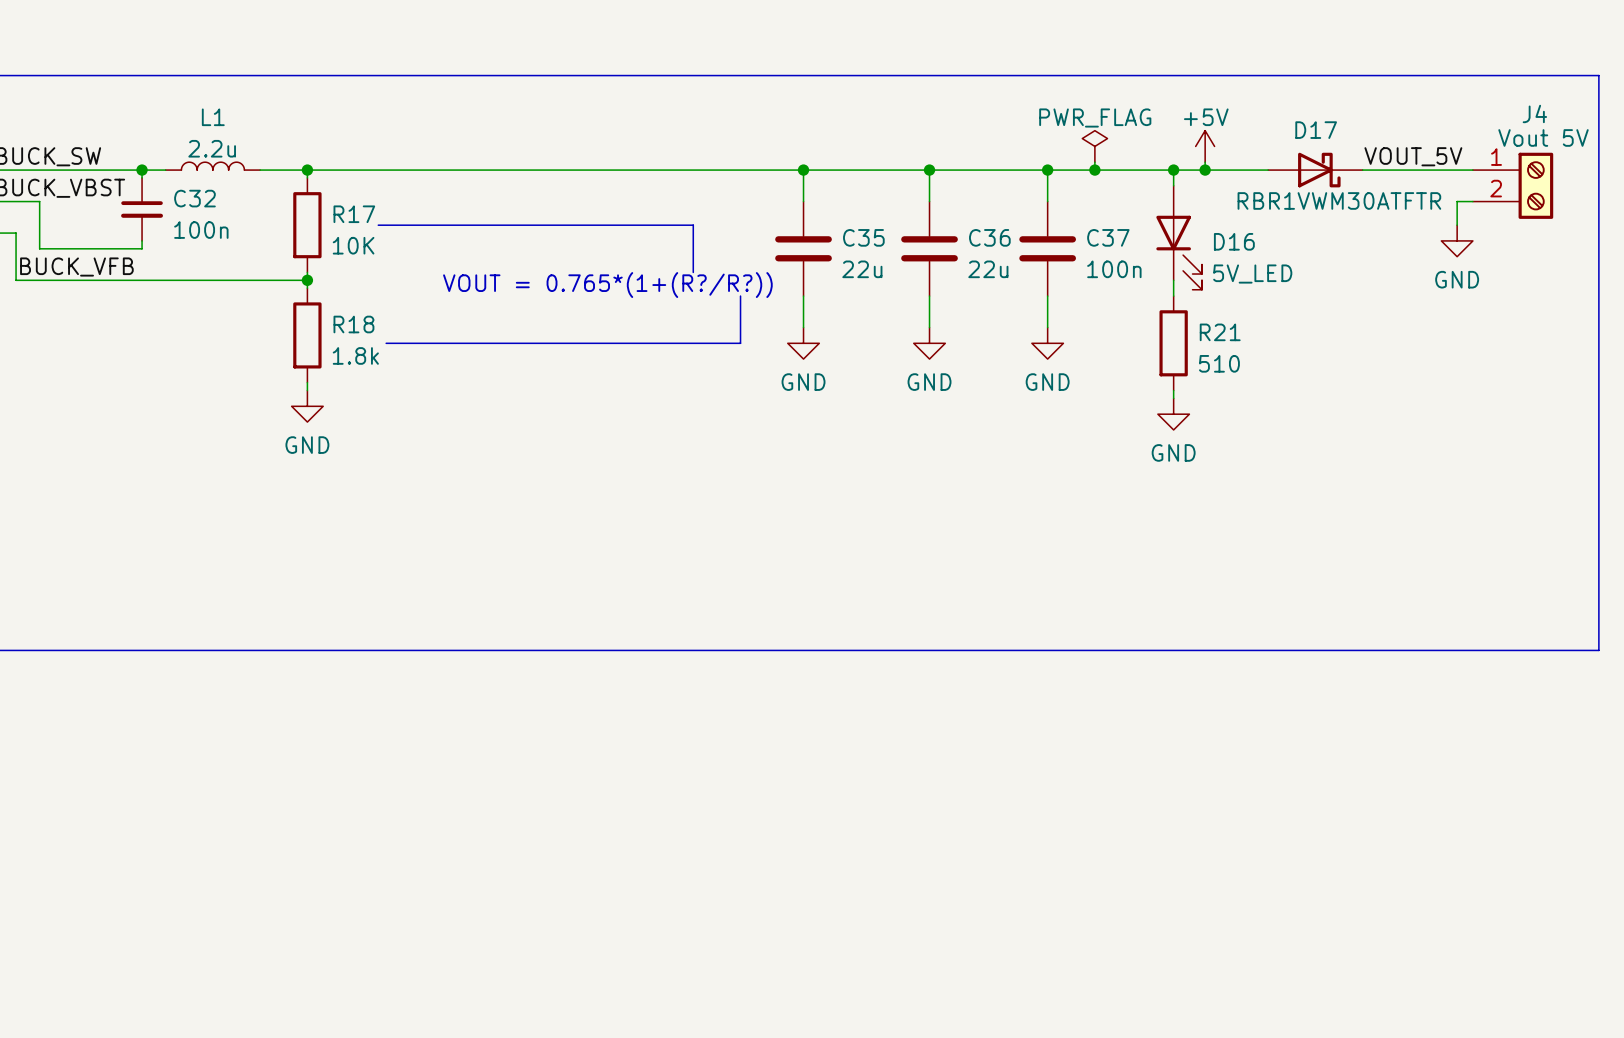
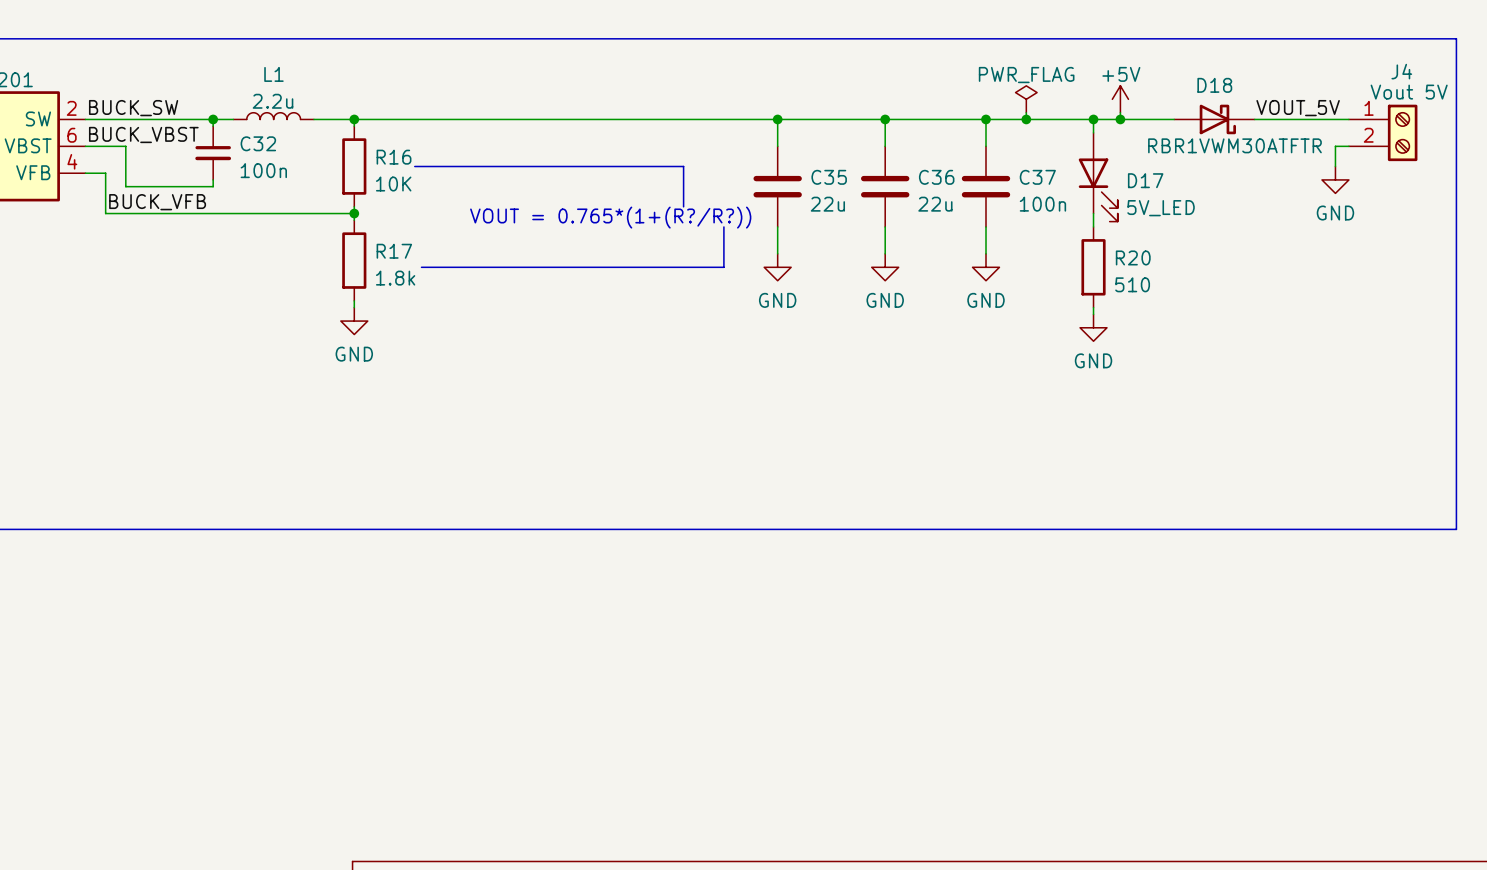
D17 name: D17 (1316, 130) -> D18 (1214, 85)
R17 name: R17 (354, 214) -> R16 (394, 157)
D16 name: D16 (1234, 241) -> D17 (1145, 180)
R18 name: R18 (353, 324) -> R17 (394, 251)
R21 name: R21 (1220, 332) -> R20 (1133, 257)

